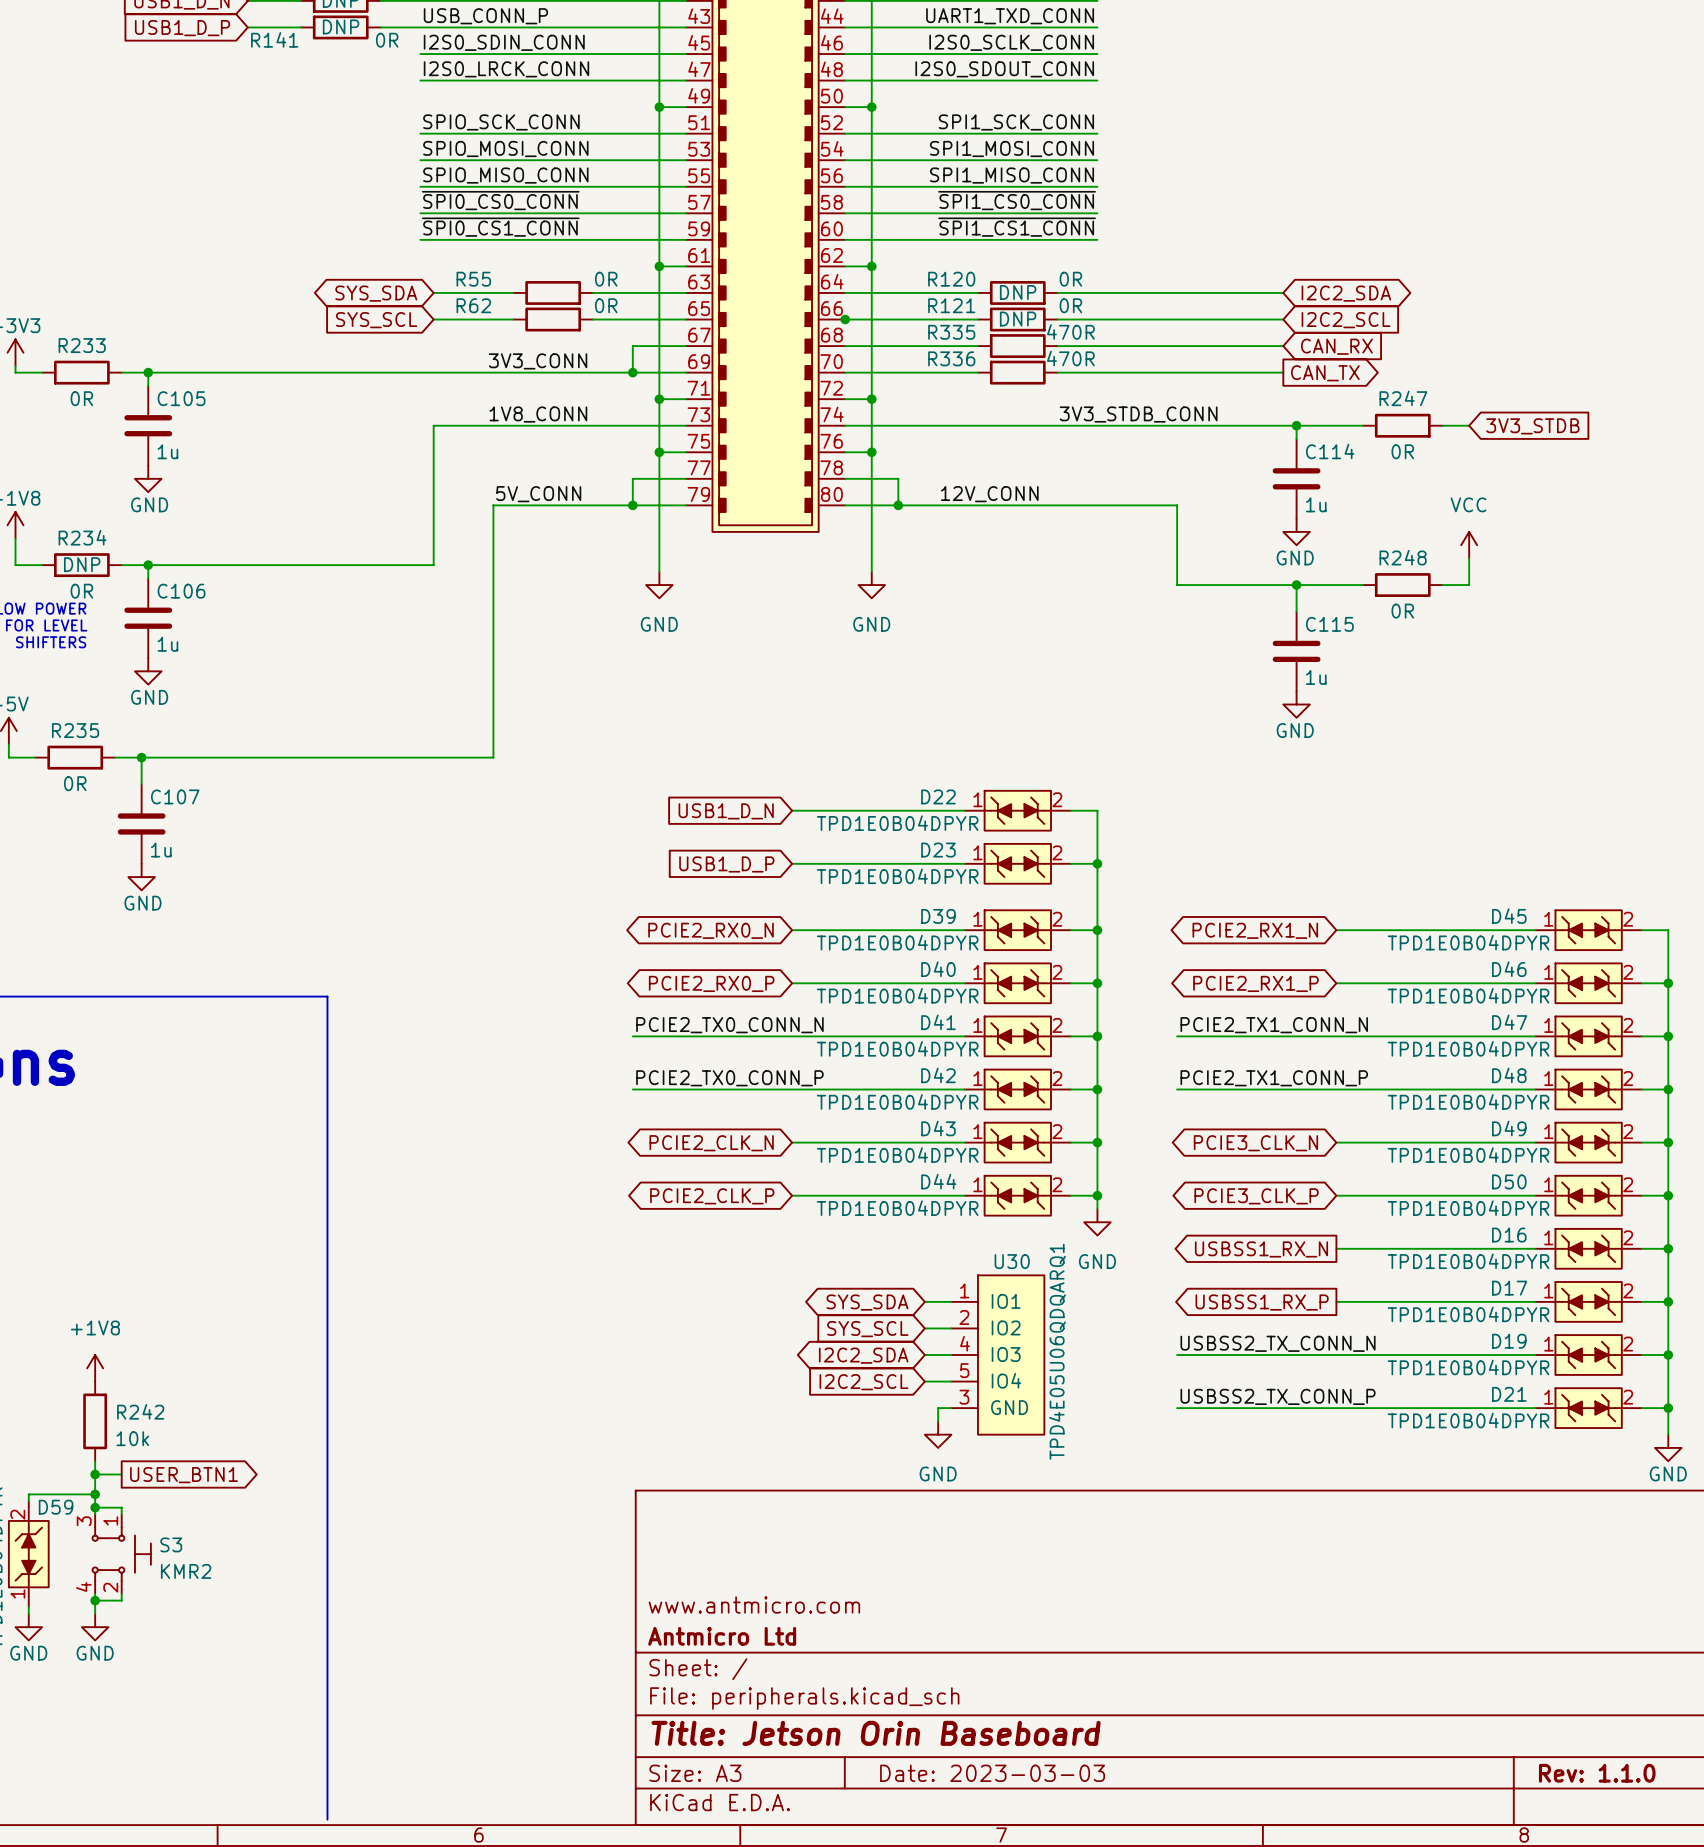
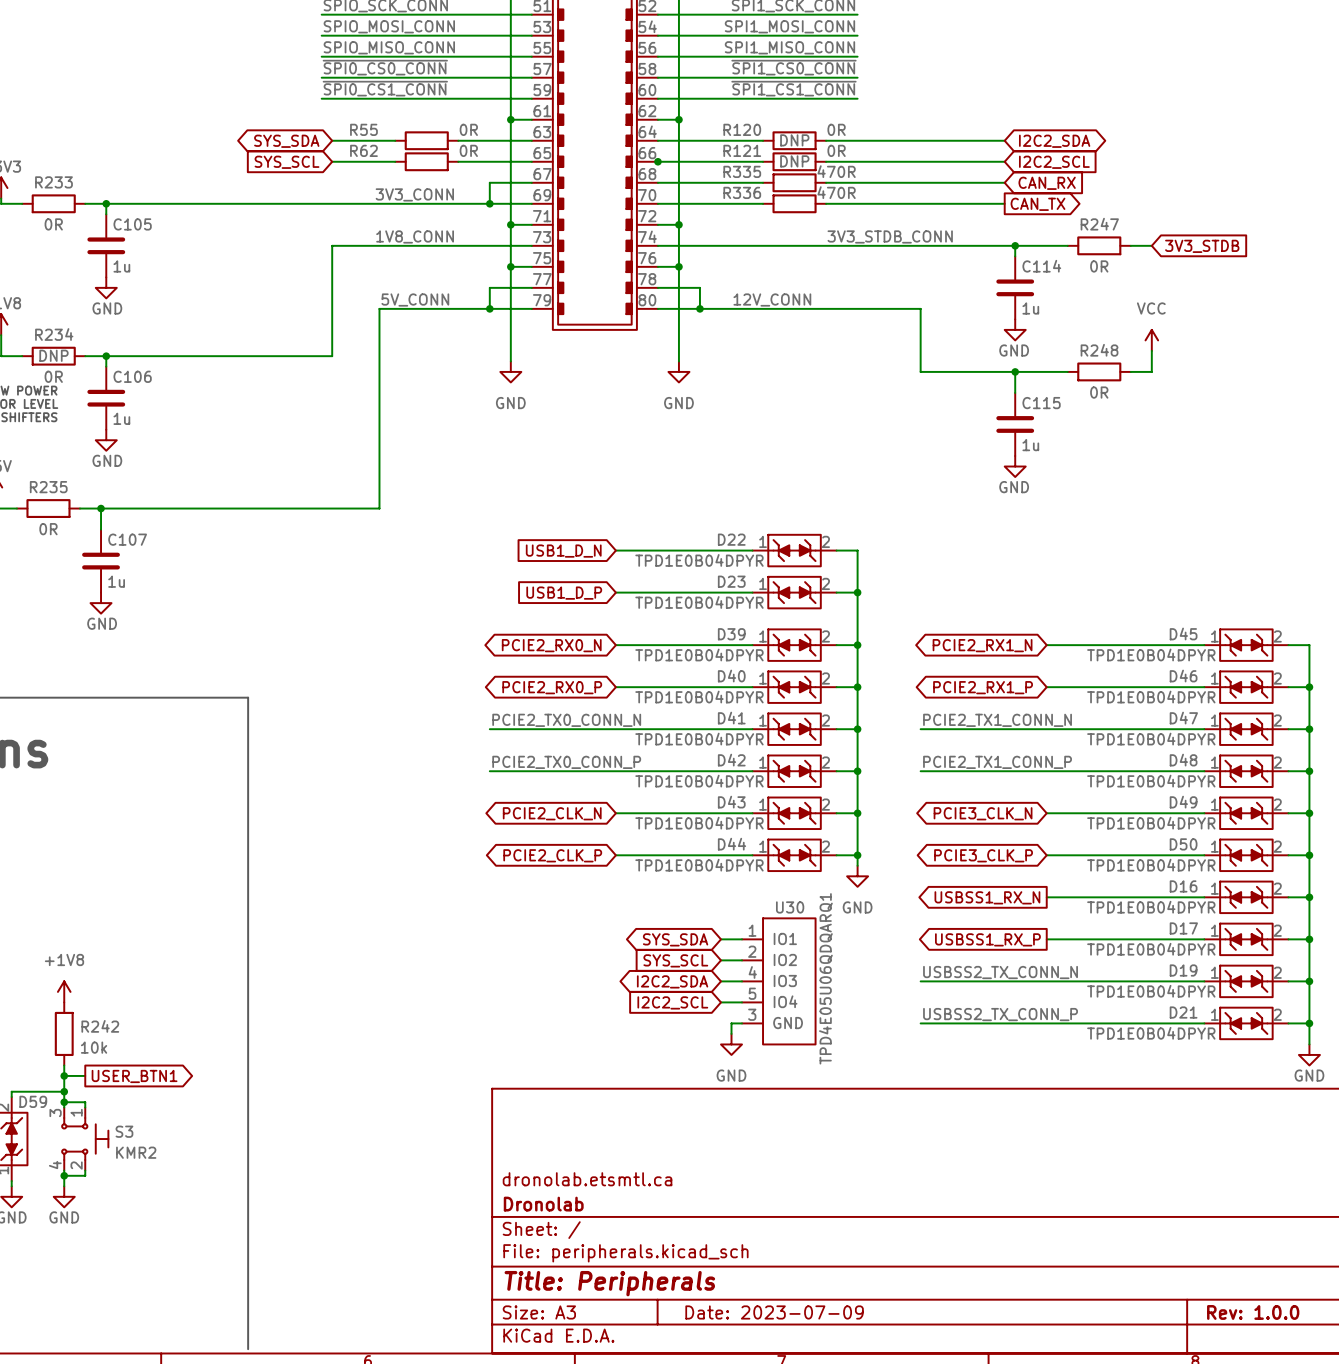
title block: www.antmicro.com (754, 1604) -> dronolab.etsmtl.ca (587, 1179)
title block: Antmicro Ltd (722, 1636) -> Dronolab (543, 1204)
title block: Title: Jetson Orin Baseboard (876, 1733) -> Title: Peripherals (609, 1283)
title block: Date: 2023-03-03 (992, 1773) -> Date: 2023-07-09 (774, 1312)
title block: Rev: 1.1.0 (1597, 1773) -> Rev: 1.0.0 (1253, 1312)

